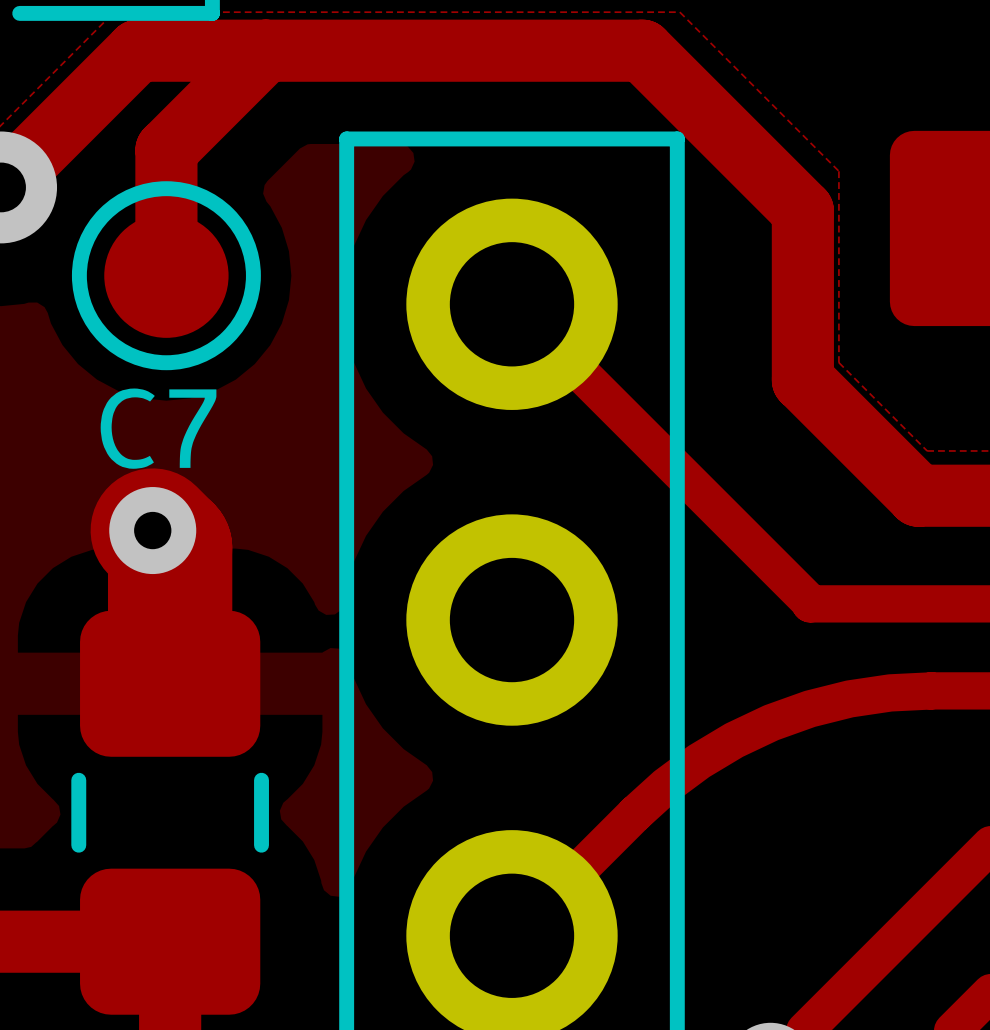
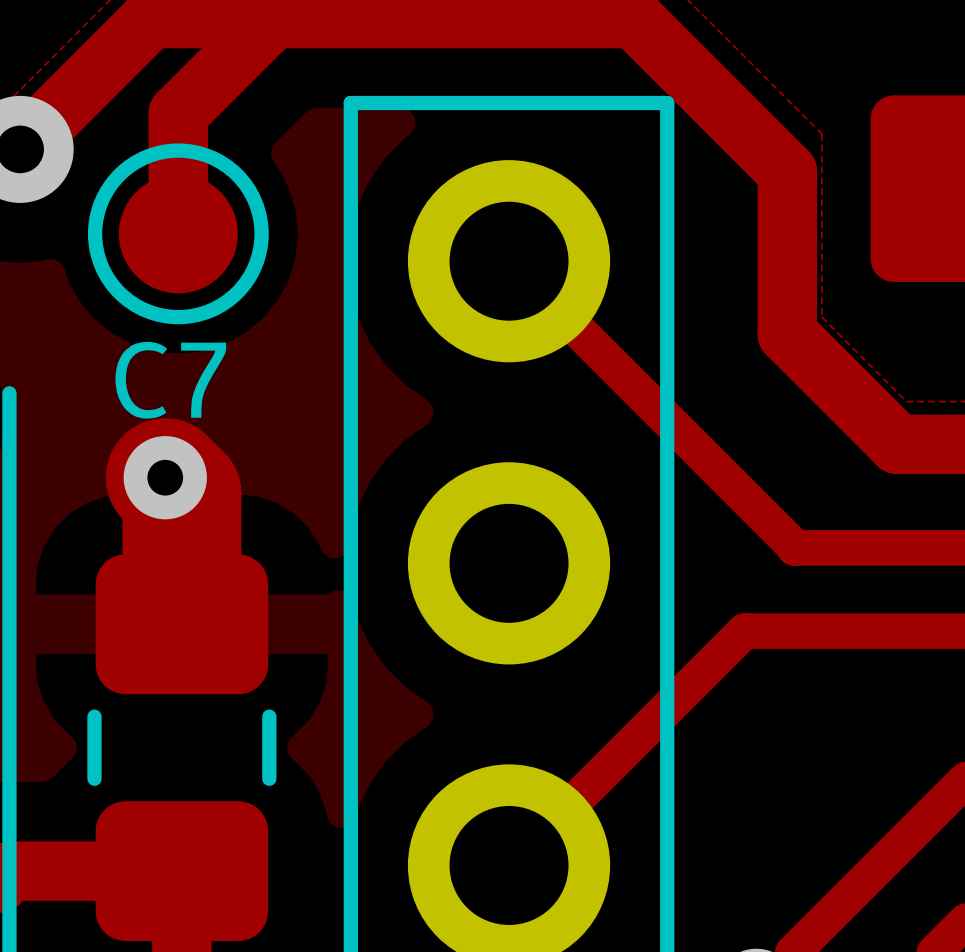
track: (931, 690) (890, 692) (849, 698) (809, 708) (771, 722) (734, 740) (699, 761) (666, 785) (635, 813) -> (910, 631) (744, 631) (627, 748)

